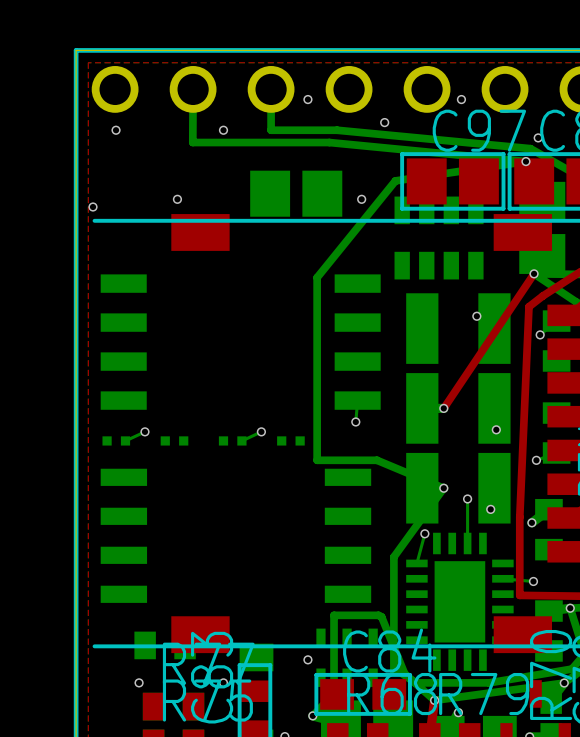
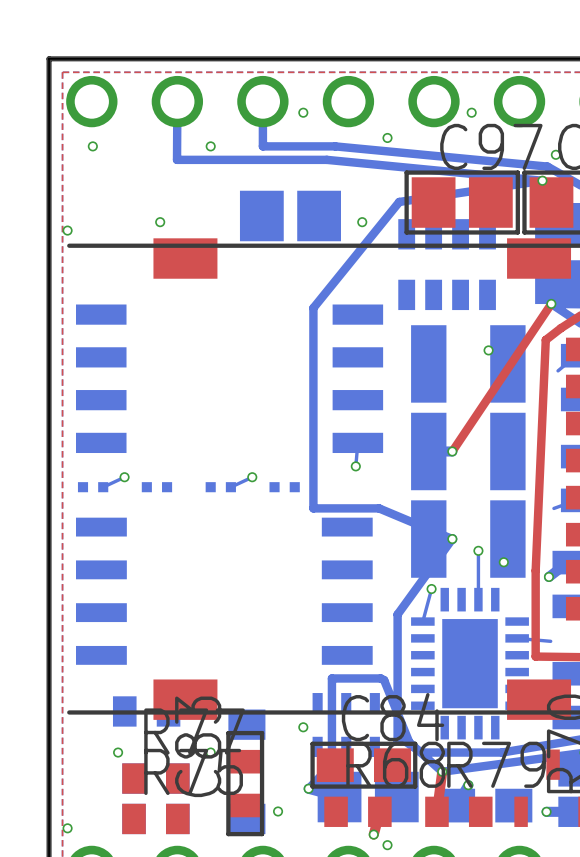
via: (540, 334) -> none
via: (496, 429) -> none
via: (536, 460) -> none
via: (533, 581) -> none

